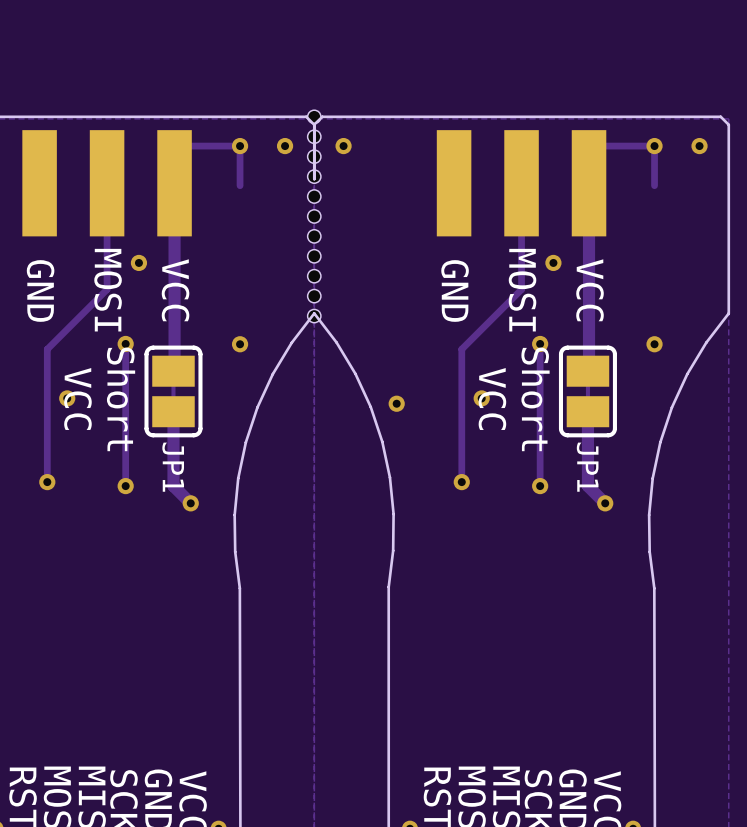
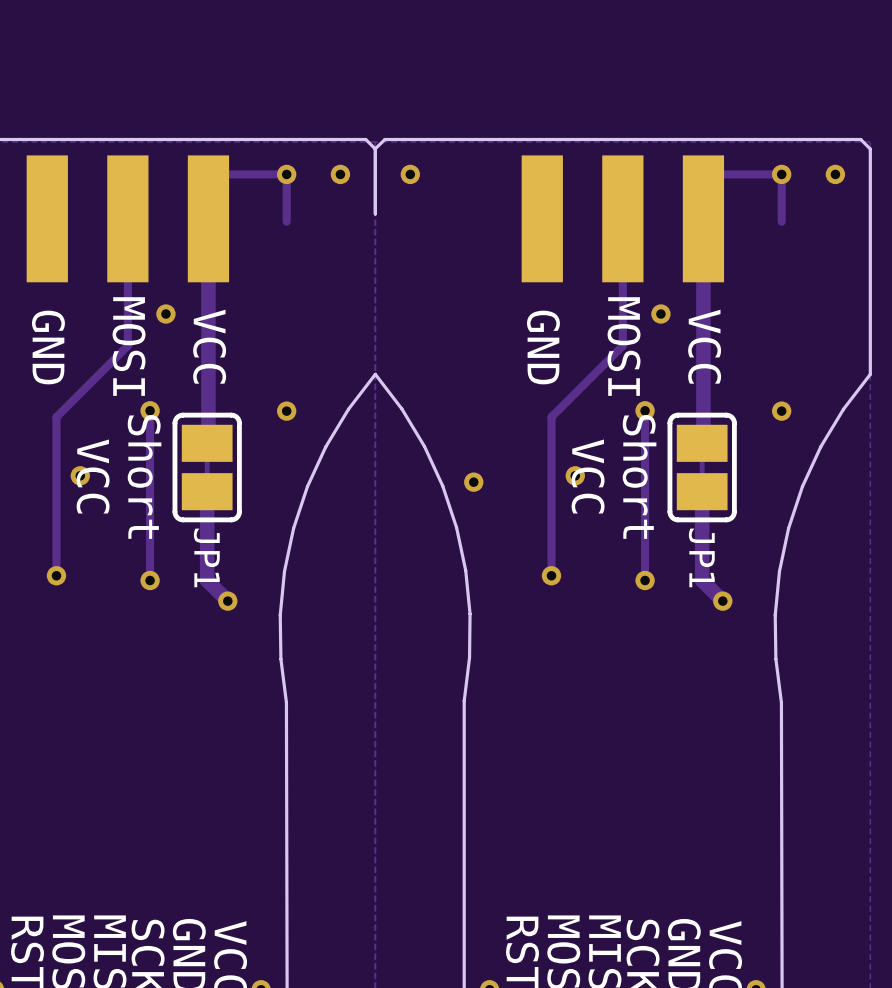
part: (314, 116) -> none
part: (314, 136) -> none
part: (314, 156) -> none
part: (314, 176) -> none
part: (314, 196) -> none
part: (314, 216) -> none
part: (314, 236) -> none
part: (314, 256) -> none
part: (314, 276) -> none
part: (314, 296) -> none
part: (314, 316) -> none

